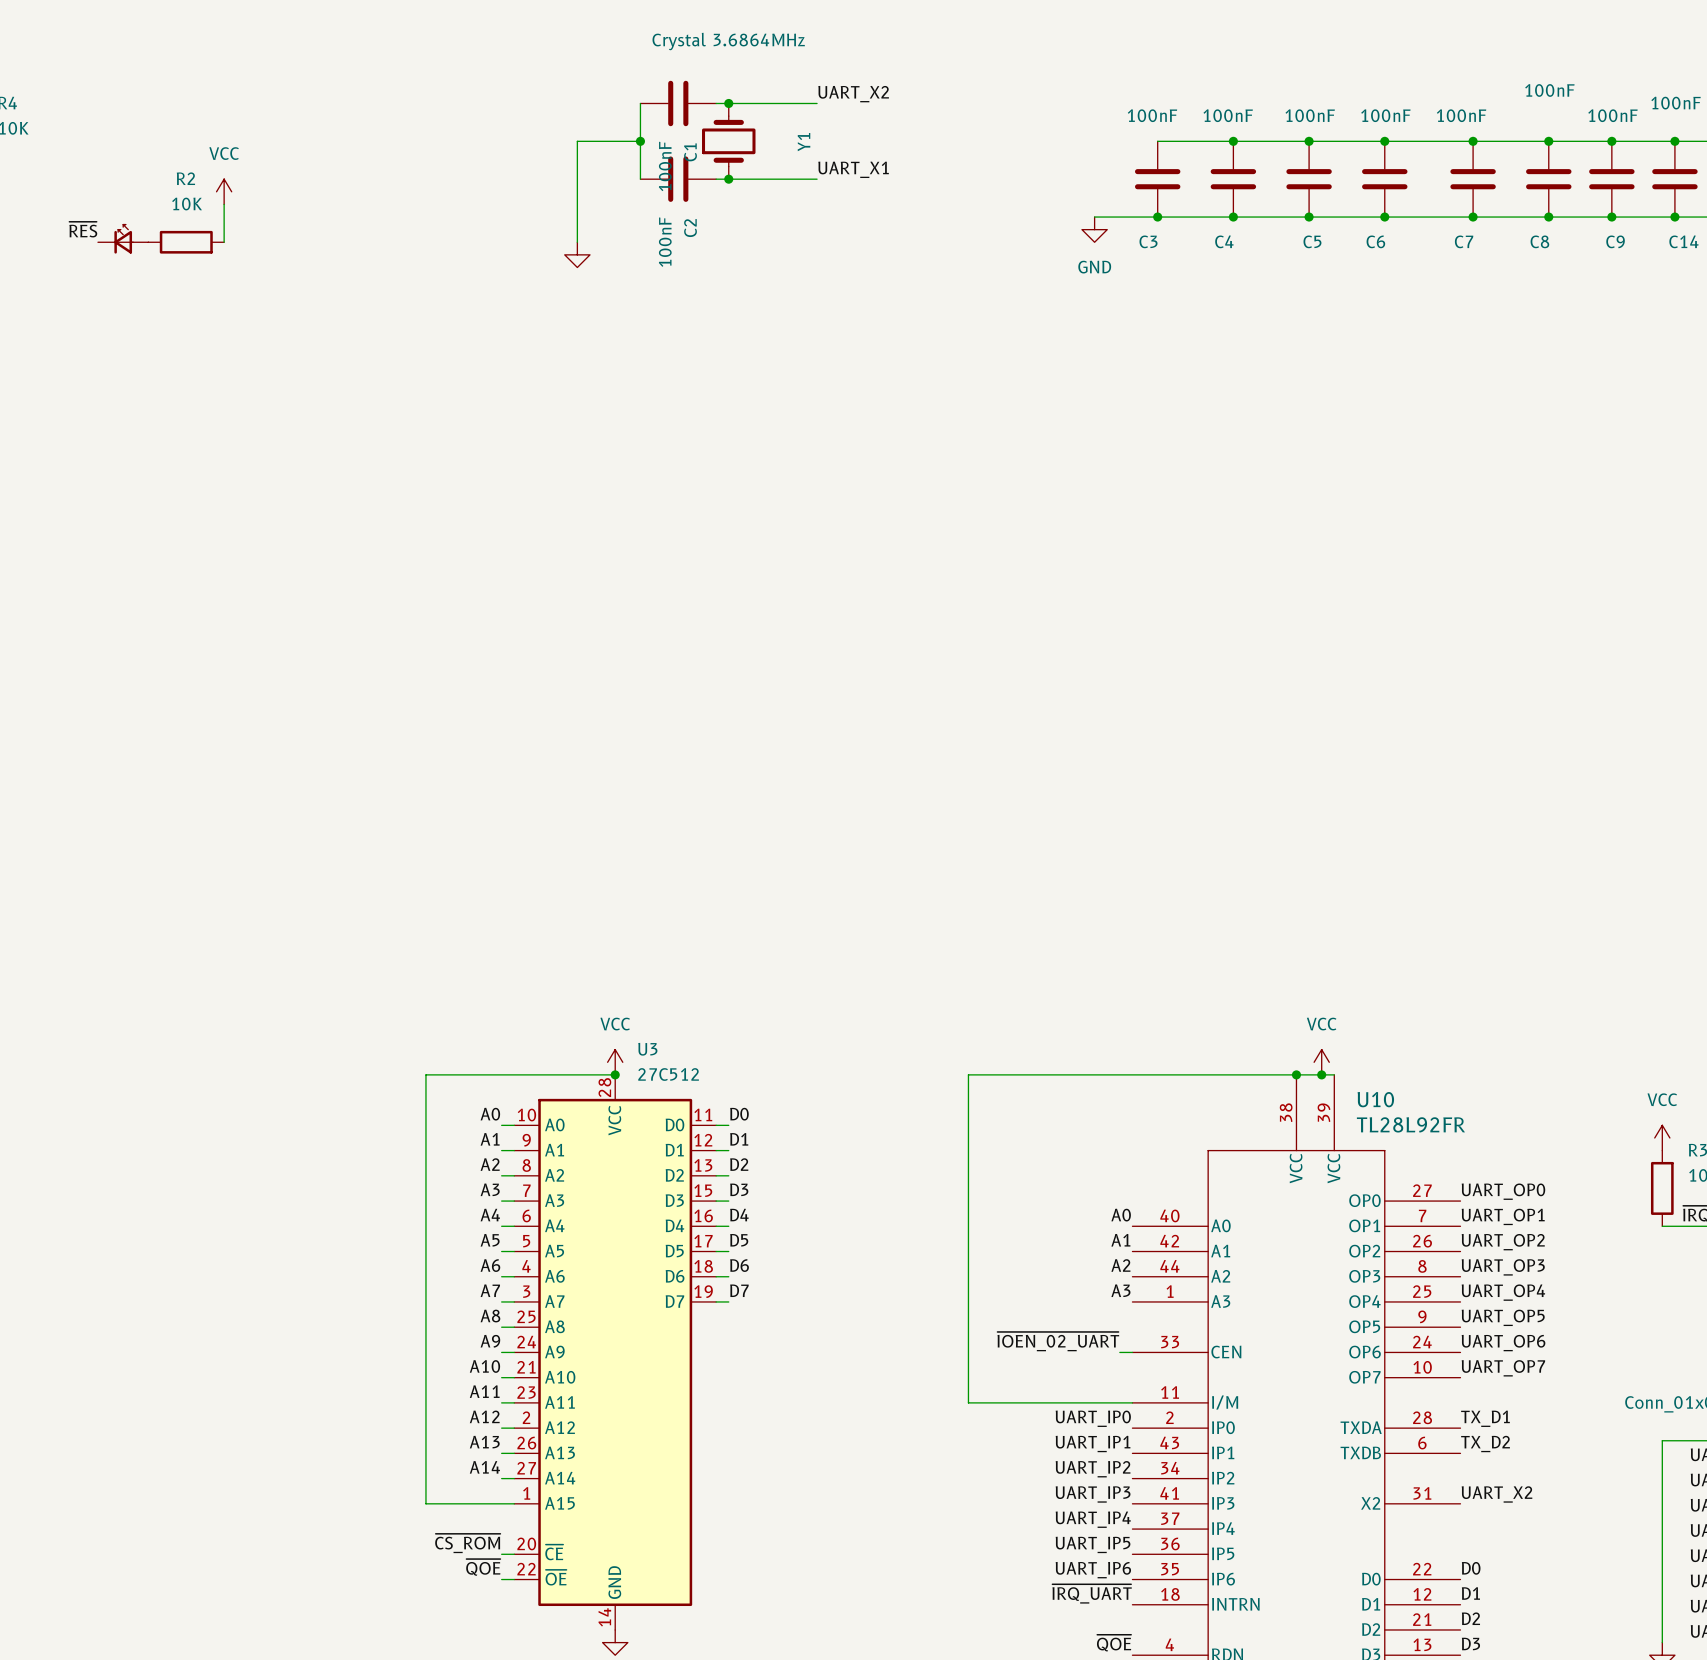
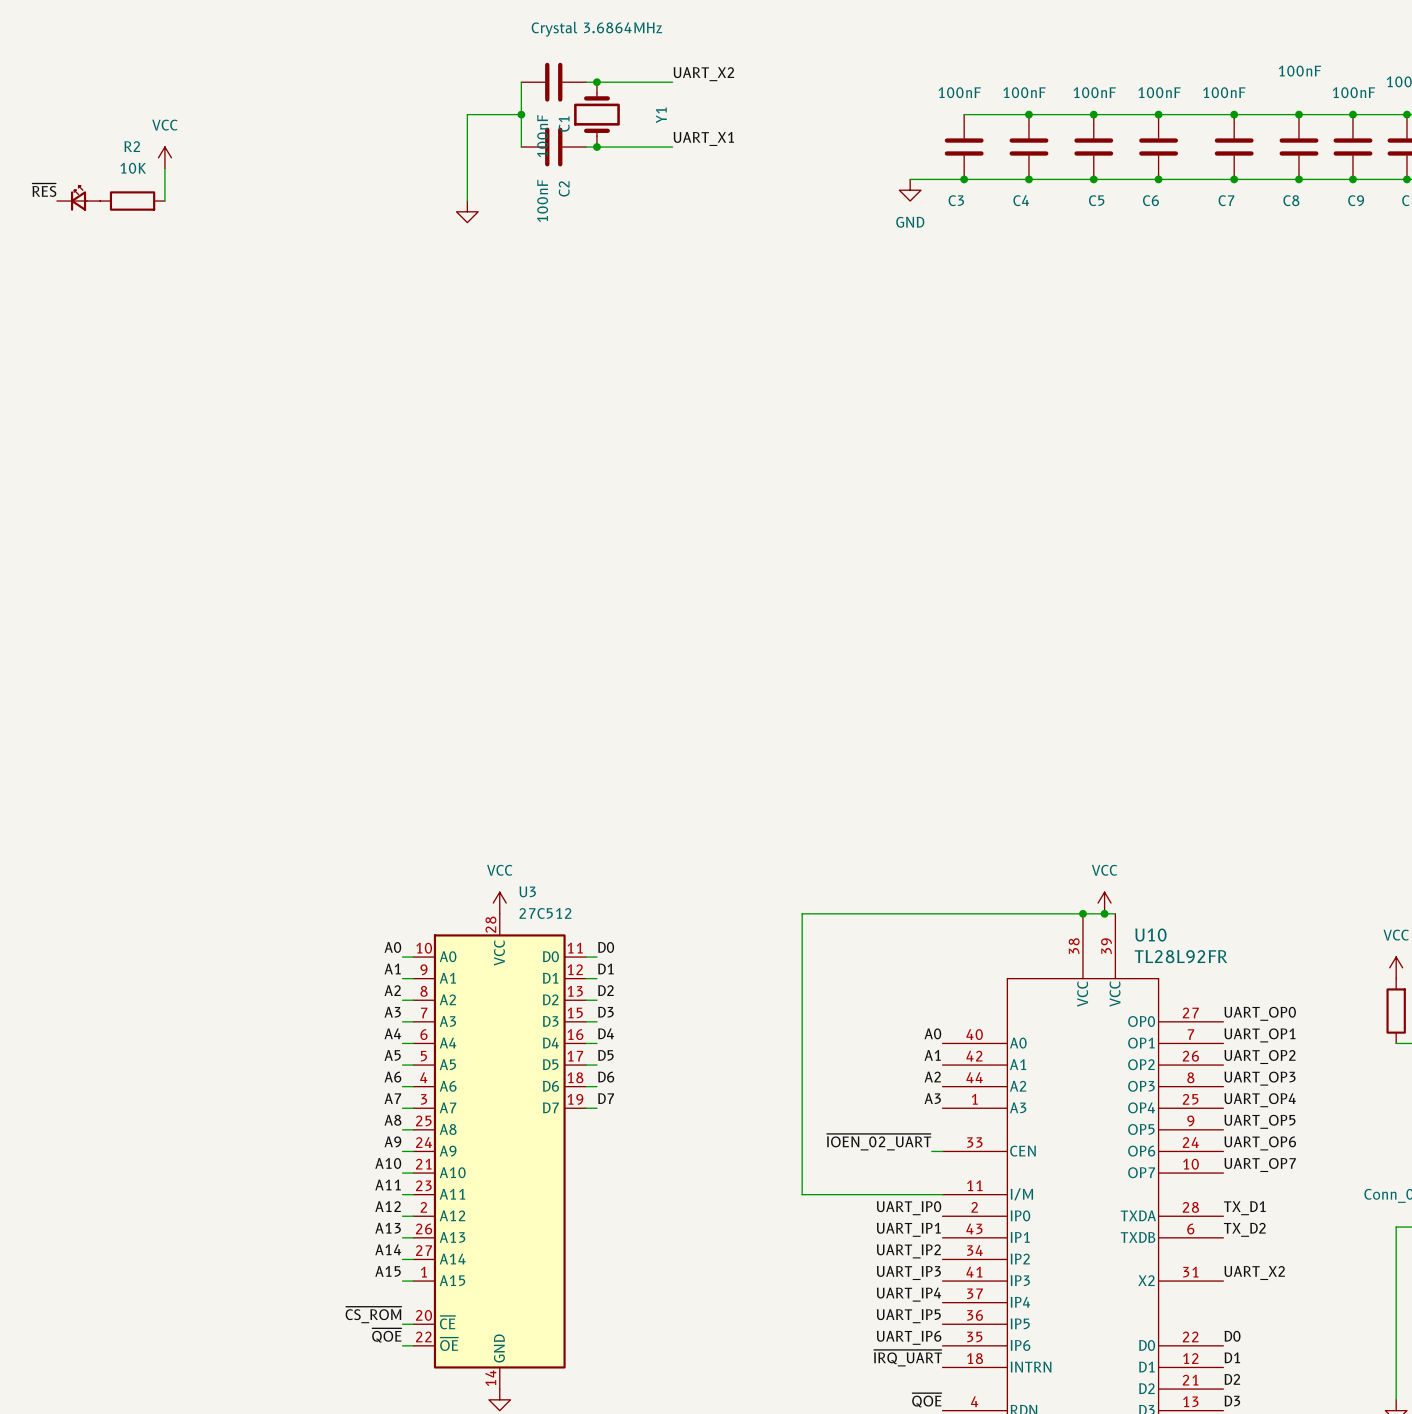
wire: (615, 1074) (425, 1074) (425, 1503) (501, 1503) -> none
junction: (615, 1074) -> none
label: none -> A15 (388, 1271)

